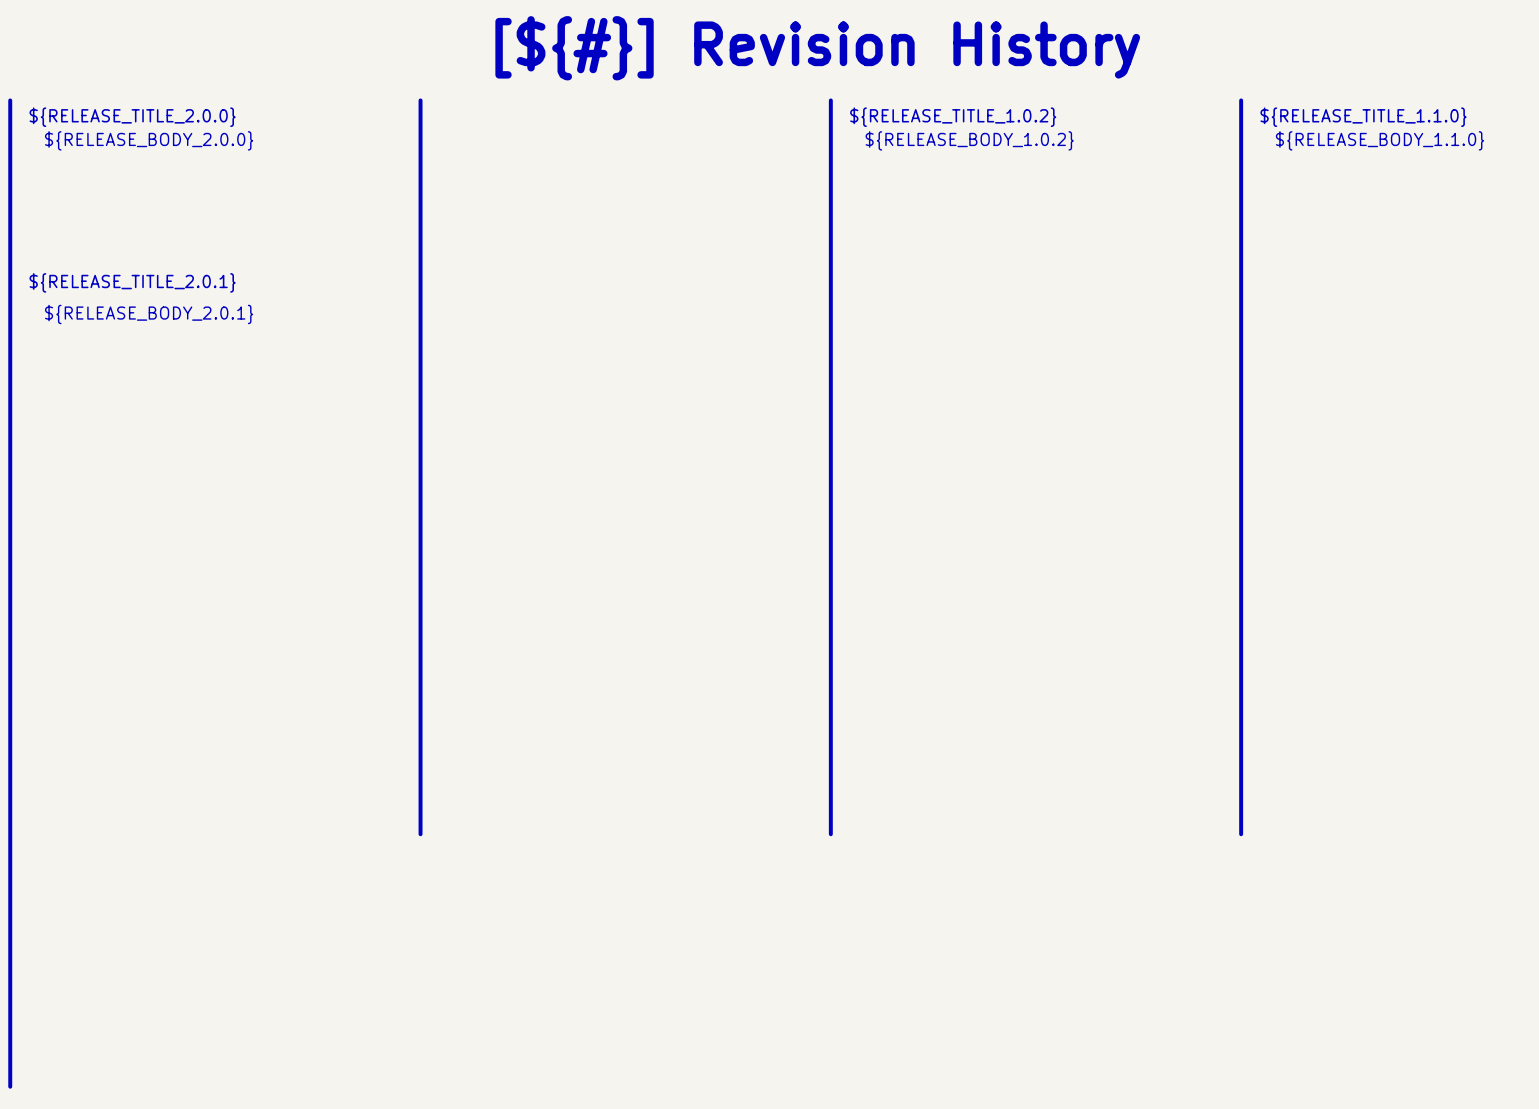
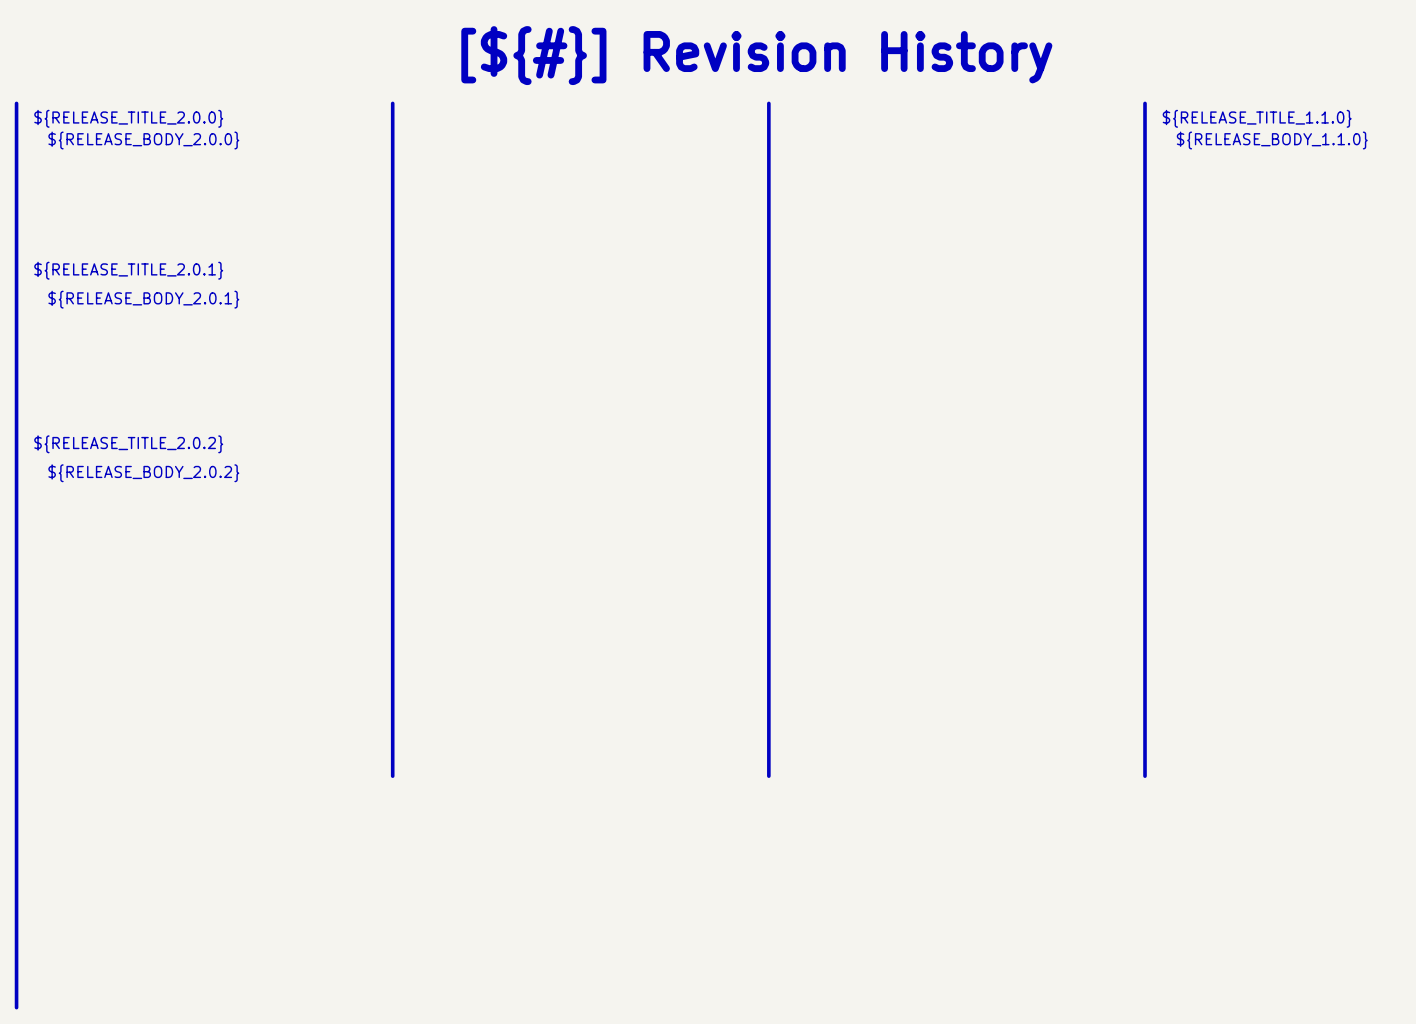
text: ${RELEASE_TITLE_1.0.2} (953, 117) -> none
text: ${RELEASE_BODY_1.0.2} (969, 140) -> none
text: none -> ${RELEASE_TITLE_2.0.2} (128, 444)
text: none -> ${RELEASE_BODY_2.0.2} (143, 473)

